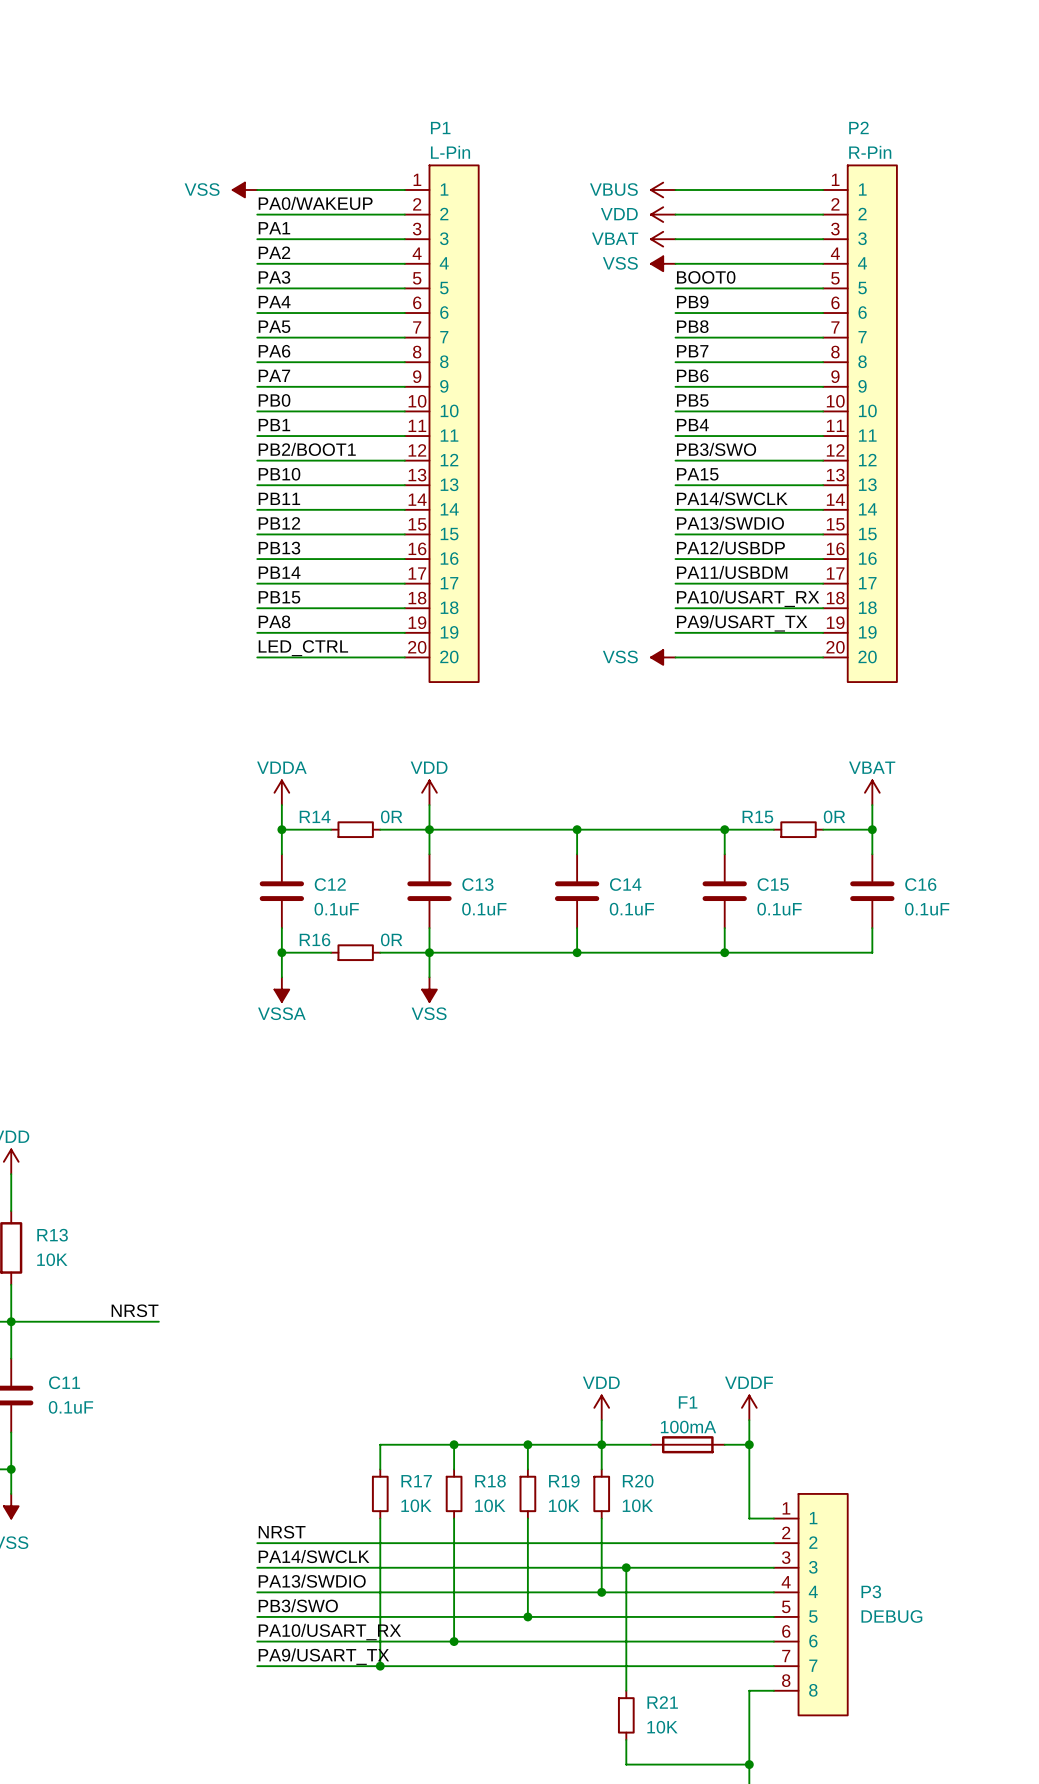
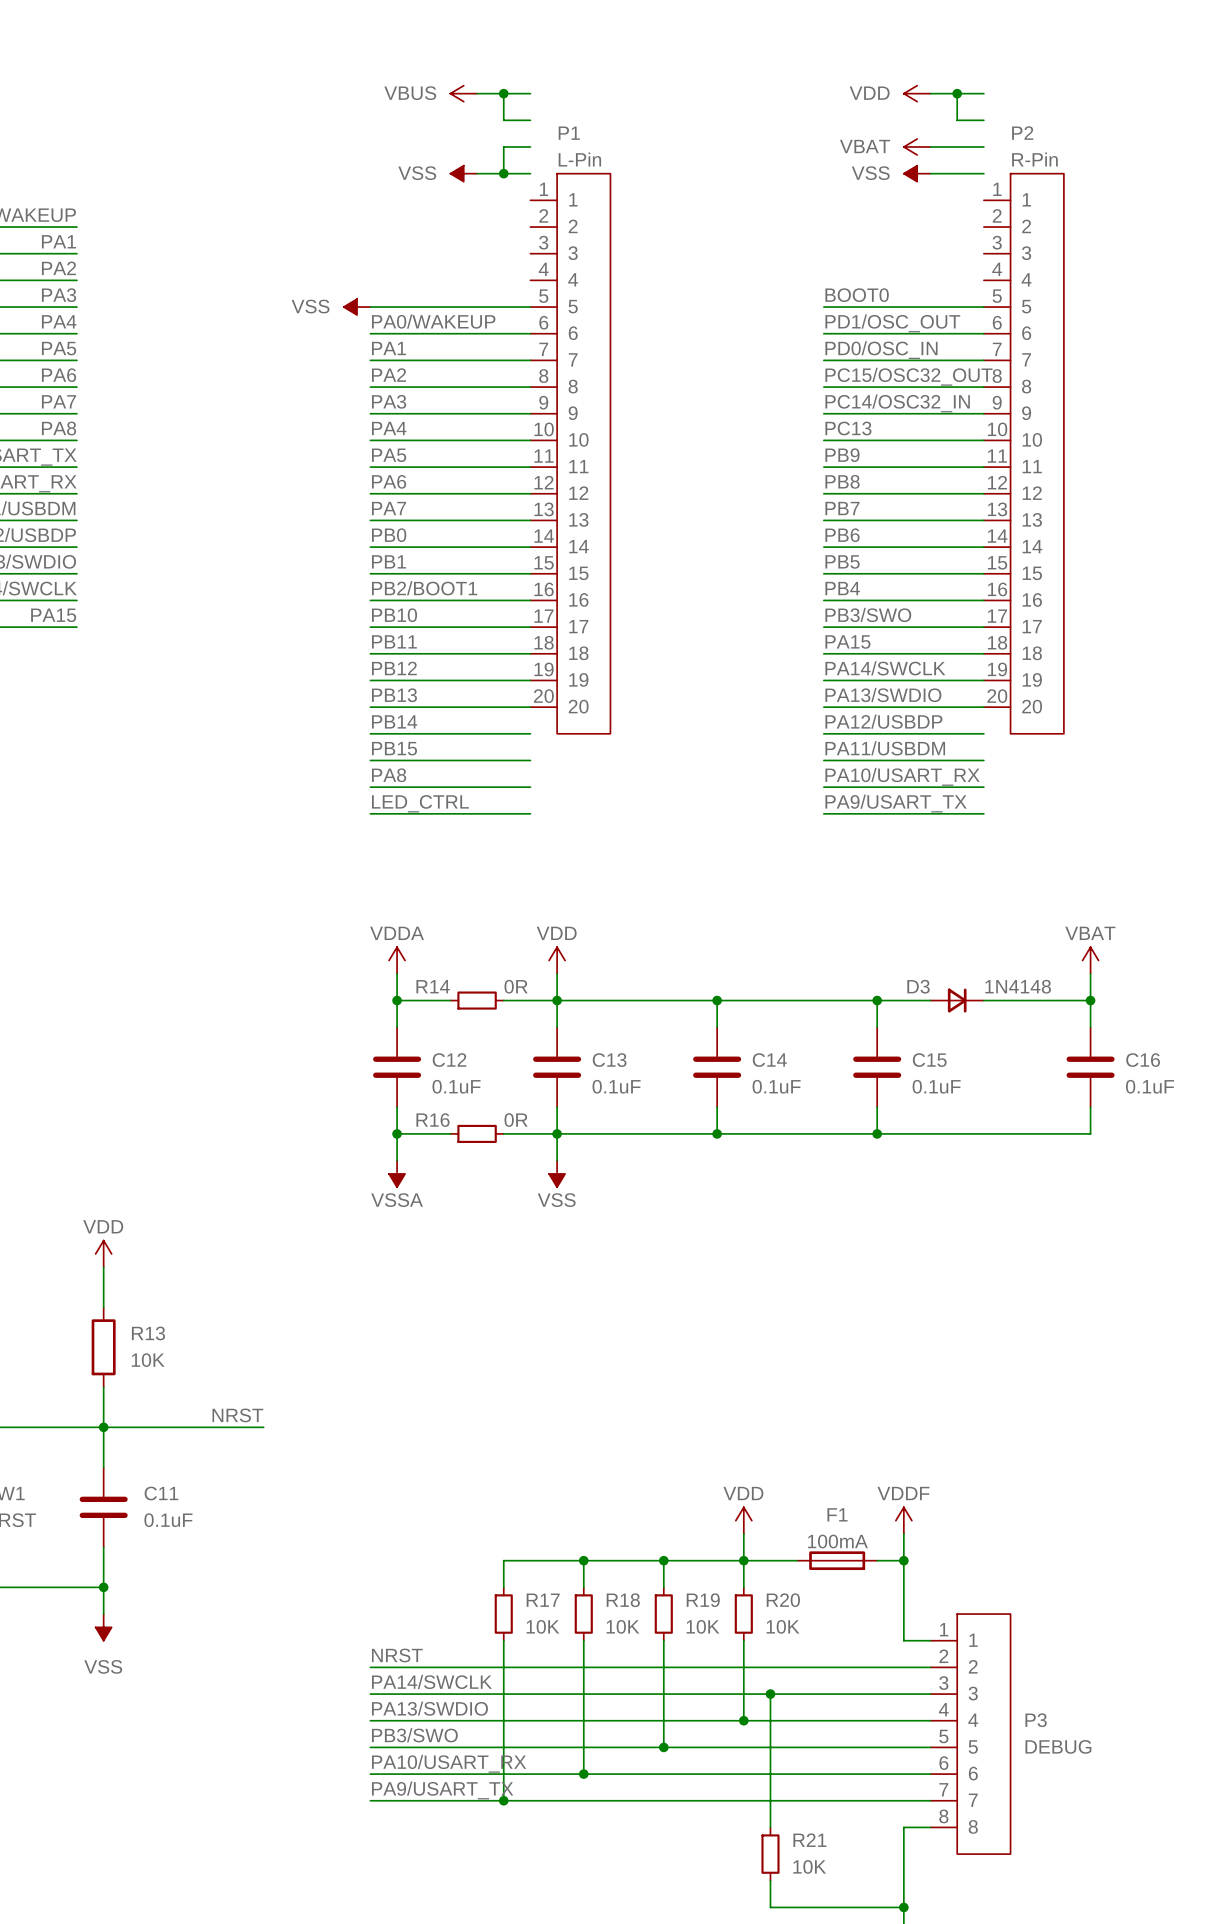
power symbol: none -> VBUS (463, 93)
wire: none -> (477, 93) (530, 93)
wire: none -> (503, 93) (503, 120) (530, 120)
junction: none -> (503, 93)
wire: none -> (930, 93) (983, 93)
wire: none -> (957, 93) (957, 120) (983, 120)
junction: none -> (957, 93)
wire: none -> (530, 147) (503, 147) (503, 173)
wire: none -> (930, 147) (983, 147)
power symbol: none -> VSS (463, 173)
wire: none -> (477, 173) (530, 173)
junction: none -> (503, 173)
wire: none -> (930, 173) (983, 173)
power symbol: VSS (244, 190) -> none
wire: (257, 190) (404, 190) -> none
power symbol: VBUS (663, 190) -> none
wire: (675, 190) (823, 190) -> none
label: PA0/WAKEUP (315, 203) -> none
wire: (257, 214) (404, 214) -> none
power symbol position: VDD (663, 214) -> VDD (917, 93)
wire: (675, 214) (823, 214) -> none
label: PA1 (274, 228) -> none
wire: (257, 239) (404, 239) -> none
power symbol position: VBAT (663, 239) -> VBAT (917, 147)
wire: (675, 239) (823, 239) -> none
label: PA2 (274, 252) -> none
wire: (257, 263) (404, 263) -> none
power symbol position: VSS (663, 263) -> VSS (917, 173)
wire: (675, 263) (823, 263) -> none
label: PA3 (274, 277) -> none
power symbol: none -> VSS (357, 307)
label: PA4 (274, 302) -> PA0/WAKEUP (433, 321)
label: PB9 (692, 302) -> PD1/OSC_OUT (892, 323)
label: PA5 (274, 326) -> PA1 (389, 348)
label: PB8 (692, 326) -> PD0/OSC_IN (881, 350)
label: PA6 (274, 351) -> PA2 (389, 375)
label: PB7 (692, 351) -> PC15/OSC32_OUT (908, 376)
label: PA7 (274, 375) -> PA3 (389, 401)
label: PB6 (692, 375) -> PC14/OSC32_IN (897, 403)
label: PB0 (274, 400) -> PA4 (389, 428)
label: PB5 (692, 400) -> PC13 (848, 428)
label: PB1 (274, 425) -> PA5 (389, 455)
label: PB4 (692, 425) -> PB9 (842, 455)
label: PB2/BOOT1 (307, 449) -> PA6 (389, 481)
label: PB3/SWO (716, 449) -> PB8 (842, 481)
label: PB10 (279, 474) -> PA7 (389, 508)
label: PA15 (697, 474) -> PB7 (842, 508)
label: PB11 (279, 498) -> PB0 (389, 535)
label: PA14/SWCLK (732, 498) -> PB6 (842, 535)
label: PB12 (279, 523) -> PB1 (389, 561)
label: PA13/SWDIO (730, 523) -> PB5 (842, 561)
label: PA12/USBDP (730, 547) -> PB4 (842, 588)
label: PB13 (279, 548) -> PB2/BOOT1 (424, 588)
label: PB14 (279, 572) -> PB10 (394, 615)
label: PA11/USBDM (732, 572) -> PB3/SWO (868, 614)
label: PB15 (279, 597) -> PB11 (394, 641)
label: PA10/USART_RX (748, 598) -> PA15 (847, 641)
label: PA8 (274, 621) -> PB12 (394, 668)
label: PA9/USART_TX (742, 623) -> PA14/SWCLK (885, 668)
label: none -> PA13/SWDIO (883, 694)
label: LED_CTRL (303, 648) -> PB13 (394, 695)
power symbol: VSS (663, 657) -> none
label: none -> PA12/USBDP (883, 721)
label: none -> PB14 (394, 721)
wire: none -> (370, 733) (530, 733)
wire: none -> (823, 733) (983, 733)
label: none -> PB15 (394, 748)
label: none -> PA11/USBDM (885, 748)
wire: none -> (370, 760) (530, 760)
wire: none -> (823, 760) (983, 760)
label: none -> PA8 (389, 775)
label: none -> PA10/USART_RX (902, 776)
wire: none -> (370, 787) (530, 787)
wire: none -> (823, 787) (983, 787)
label: none -> LED_CTRL (420, 803)
label: none -> PA9/USART_TX (896, 803)
wire: none -> (370, 813) (530, 813)
wire: none -> (823, 813) (983, 813)
power symbol position: VDDA (281, 792) -> VDDA (397, 960)
power symbol position: VDD (429, 792) -> VDD (557, 960)
power symbol position: VBAT (872, 792) -> VBAT (1090, 960)
wire: (281, 805) (281, 854) -> (397, 1107) (397, 1160)
wire: (429, 805) (429, 854) -> (557, 1107) (557, 1160)
wire: (872, 805) (872, 854) -> (1090, 973) (1090, 1027)
wire: (281, 829) (331, 829) -> (397, 1133) (450, 1133)
junction: (281, 829) -> none
R14 position: (355, 829) -> (477, 1000)
wire: (380, 829) (773, 829) -> (503, 1000) (930, 1000)
junction: (429, 829) -> none
wire: (577, 829) (577, 854) -> (717, 1107) (717, 1133)
junction: (577, 829) -> none
wire: (724, 829) (724, 854) -> (877, 1107) (877, 1133)
junction: (724, 829) -> none
R15: 0R (798, 829) -> none
wire: (823, 829) (872, 829) -> none
junction: (872, 829) -> none
C12 position: (281, 891) -> (397, 1067)
C13 position: (429, 891) -> (557, 1067)
C14 position: (577, 891) -> (717, 1067)
C15 position: (724, 891) -> (877, 1067)
C16 position: (872, 891) -> (1090, 1067)
wire: none -> (397, 973) (397, 1000) (450, 1000)
D3: none -> 1N4148 (957, 1000)
wire: none -> (983, 1000) (1090, 1000)
wire: (872, 928) (872, 952) (380, 952) -> none
junction: none -> (1090, 1000)
junction position: (281, 952) -> (397, 1000)
wire: (331, 952) (281, 952) (281, 977) -> none
R16 position: (355, 952) -> (477, 1133)
junction position: (429, 952) -> (557, 1000)
junction position: (577, 952) -> (717, 1000)
junction position: (724, 952) -> (877, 1000)
power symbol position: VSSA (281, 989) -> VSSA (397, 1173)
power symbol position: VSS (429, 989) -> VSS (557, 1173)
wire: none -> (1090, 1107) (1090, 1133) (503, 1133)
junction: none -> (397, 1133)
junction: none -> (557, 1133)
junction: none -> (717, 1133)
junction: none -> (877, 1133)

